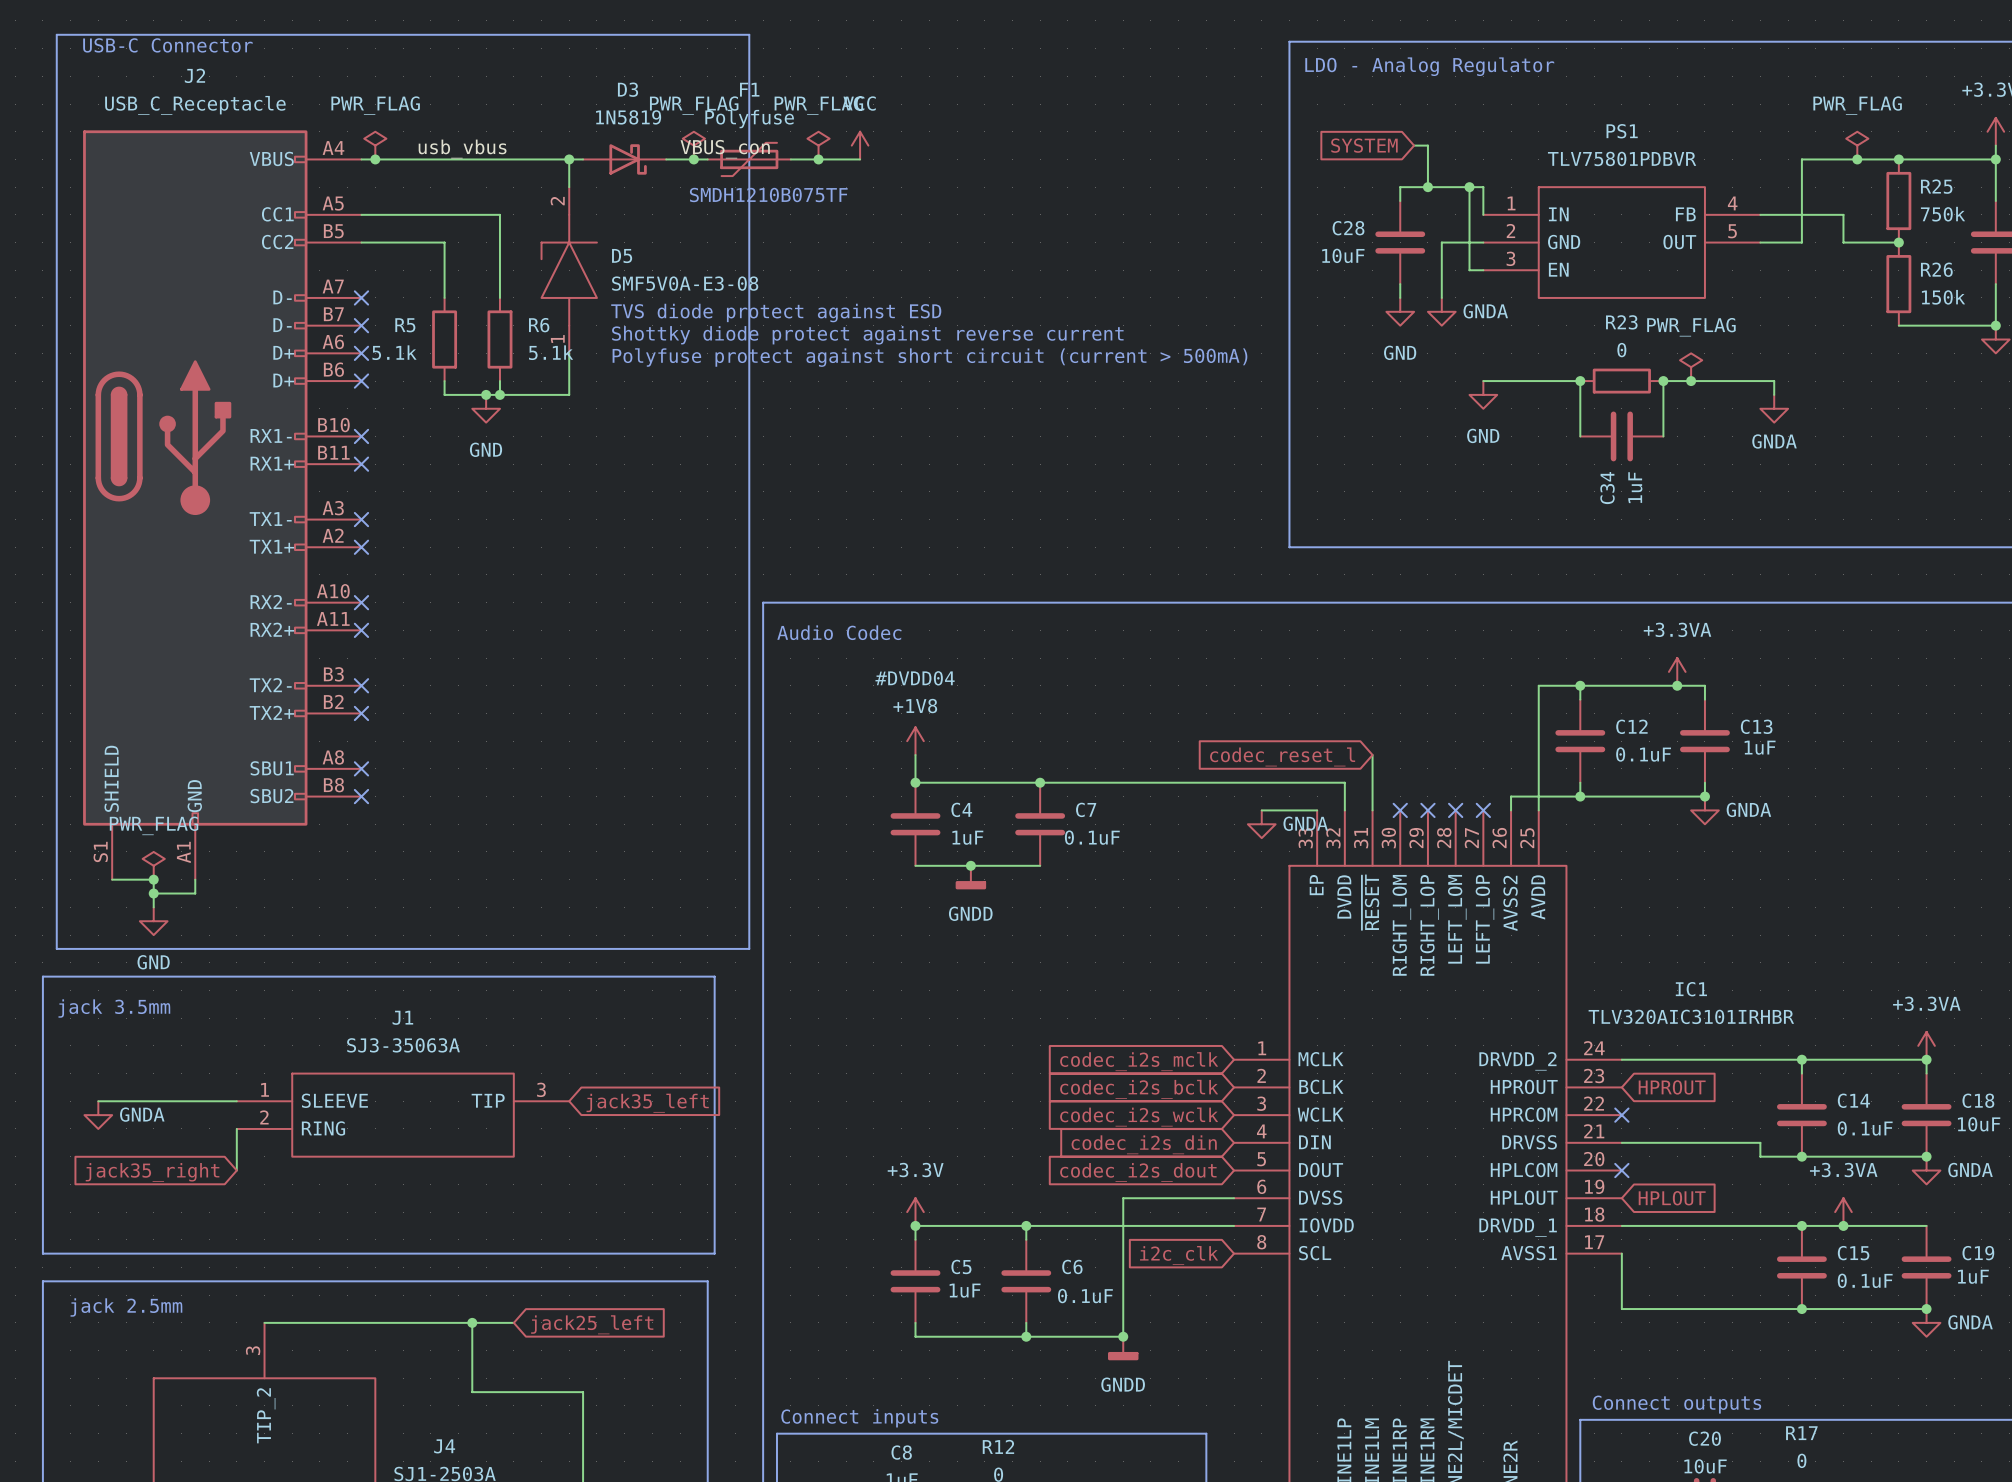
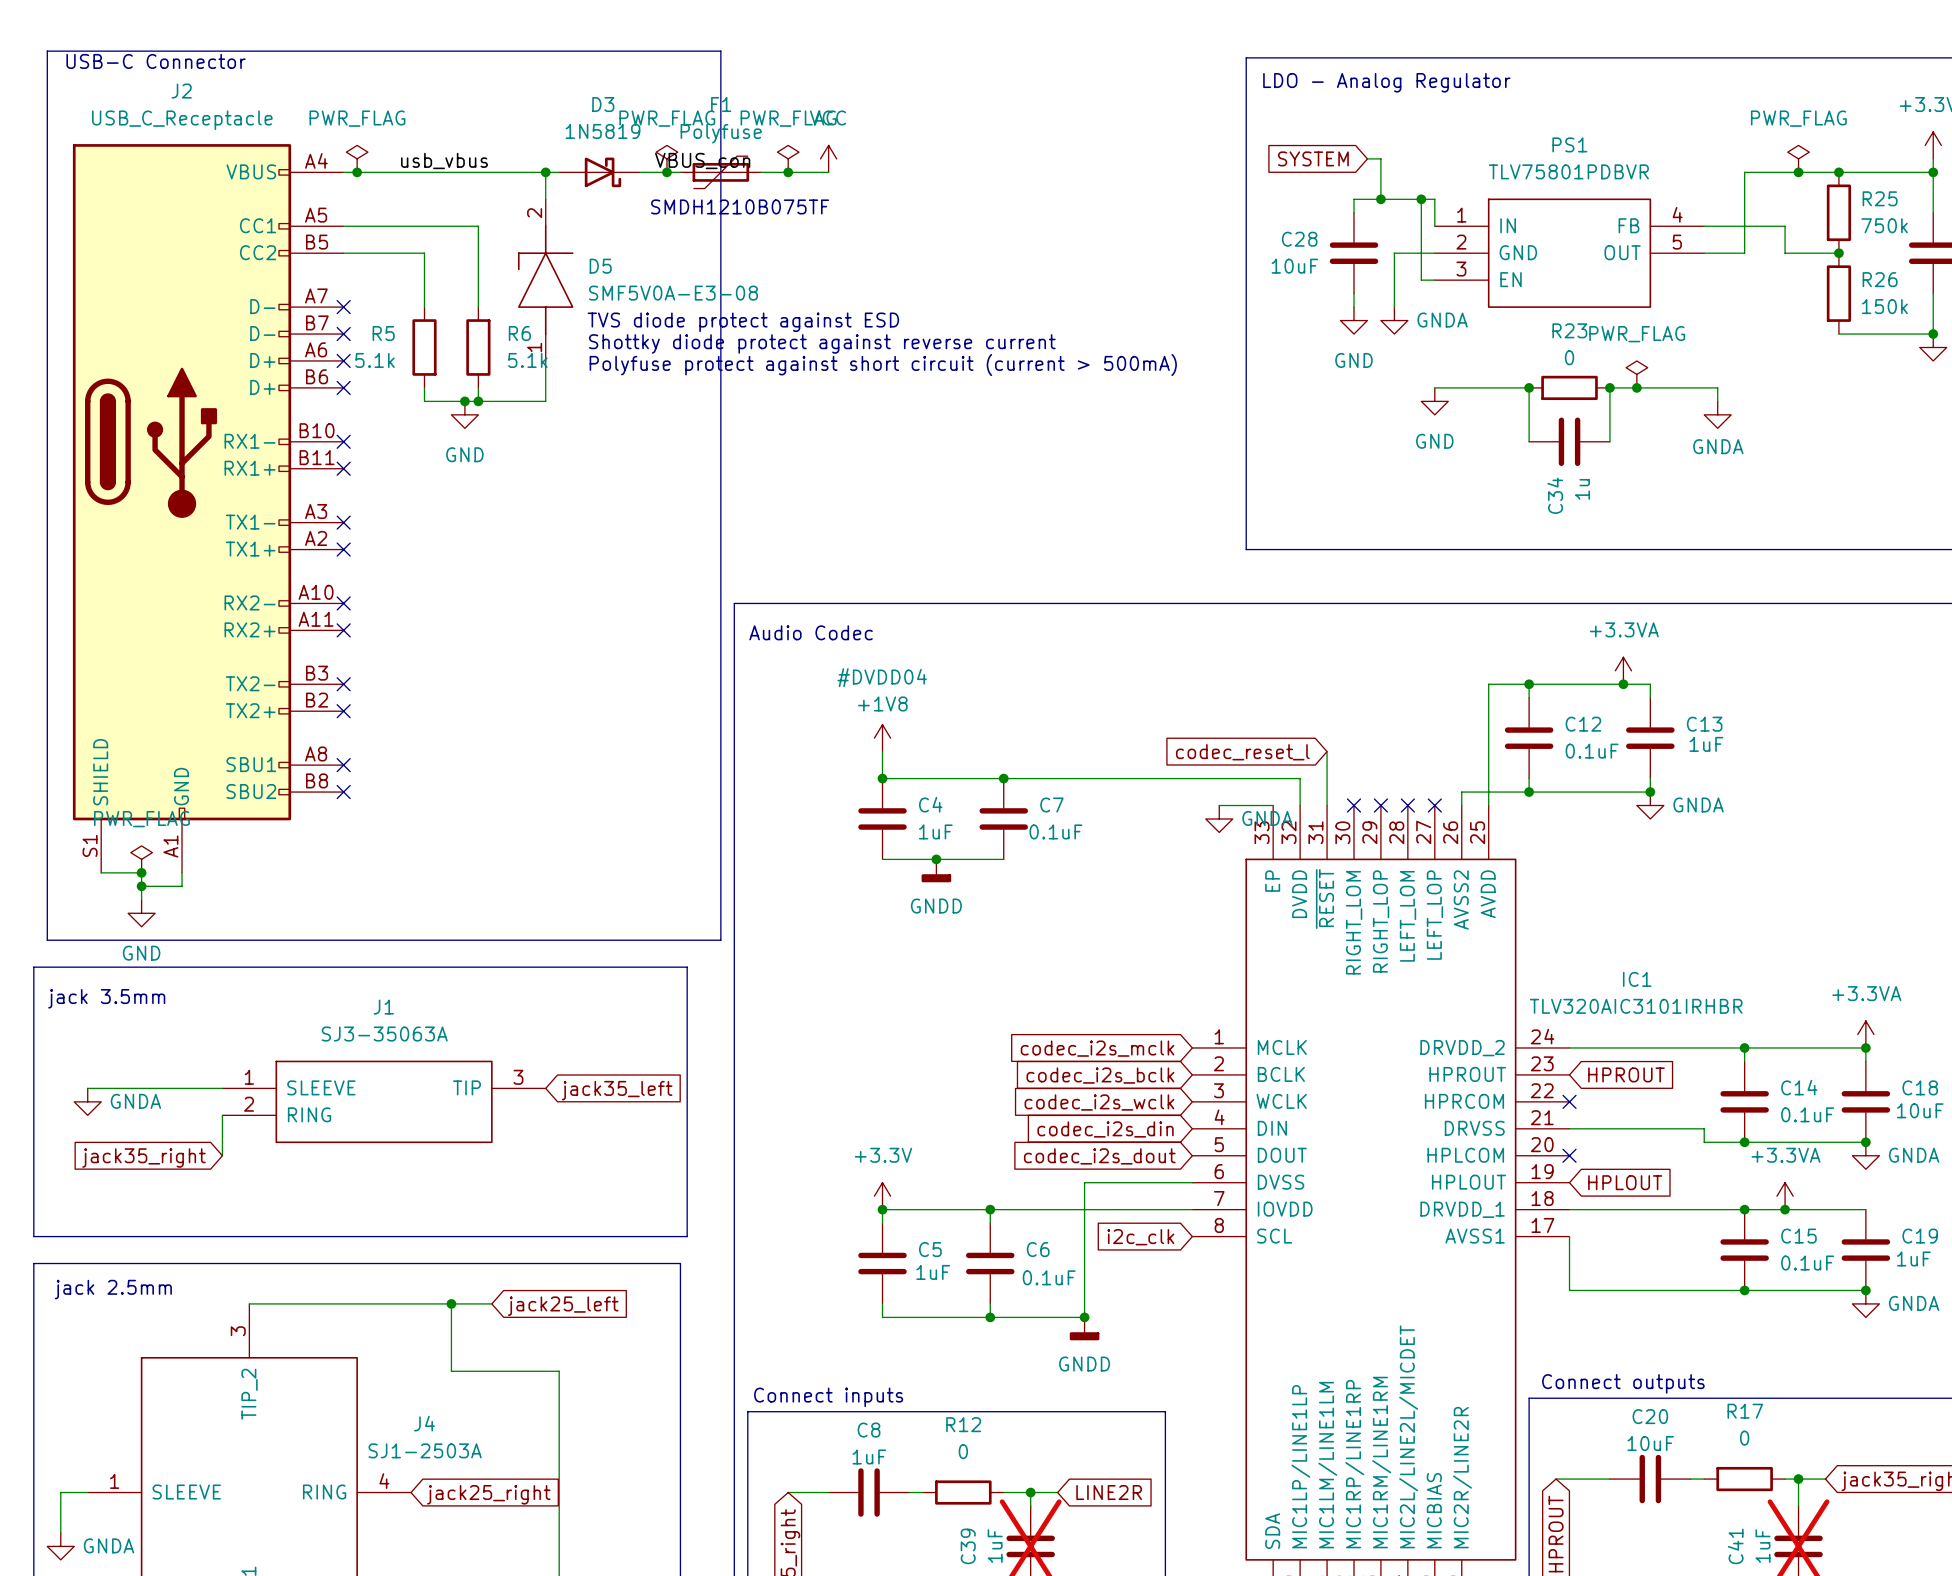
C34 value: 1uF (1635, 487) -> 1u (1582, 489)

